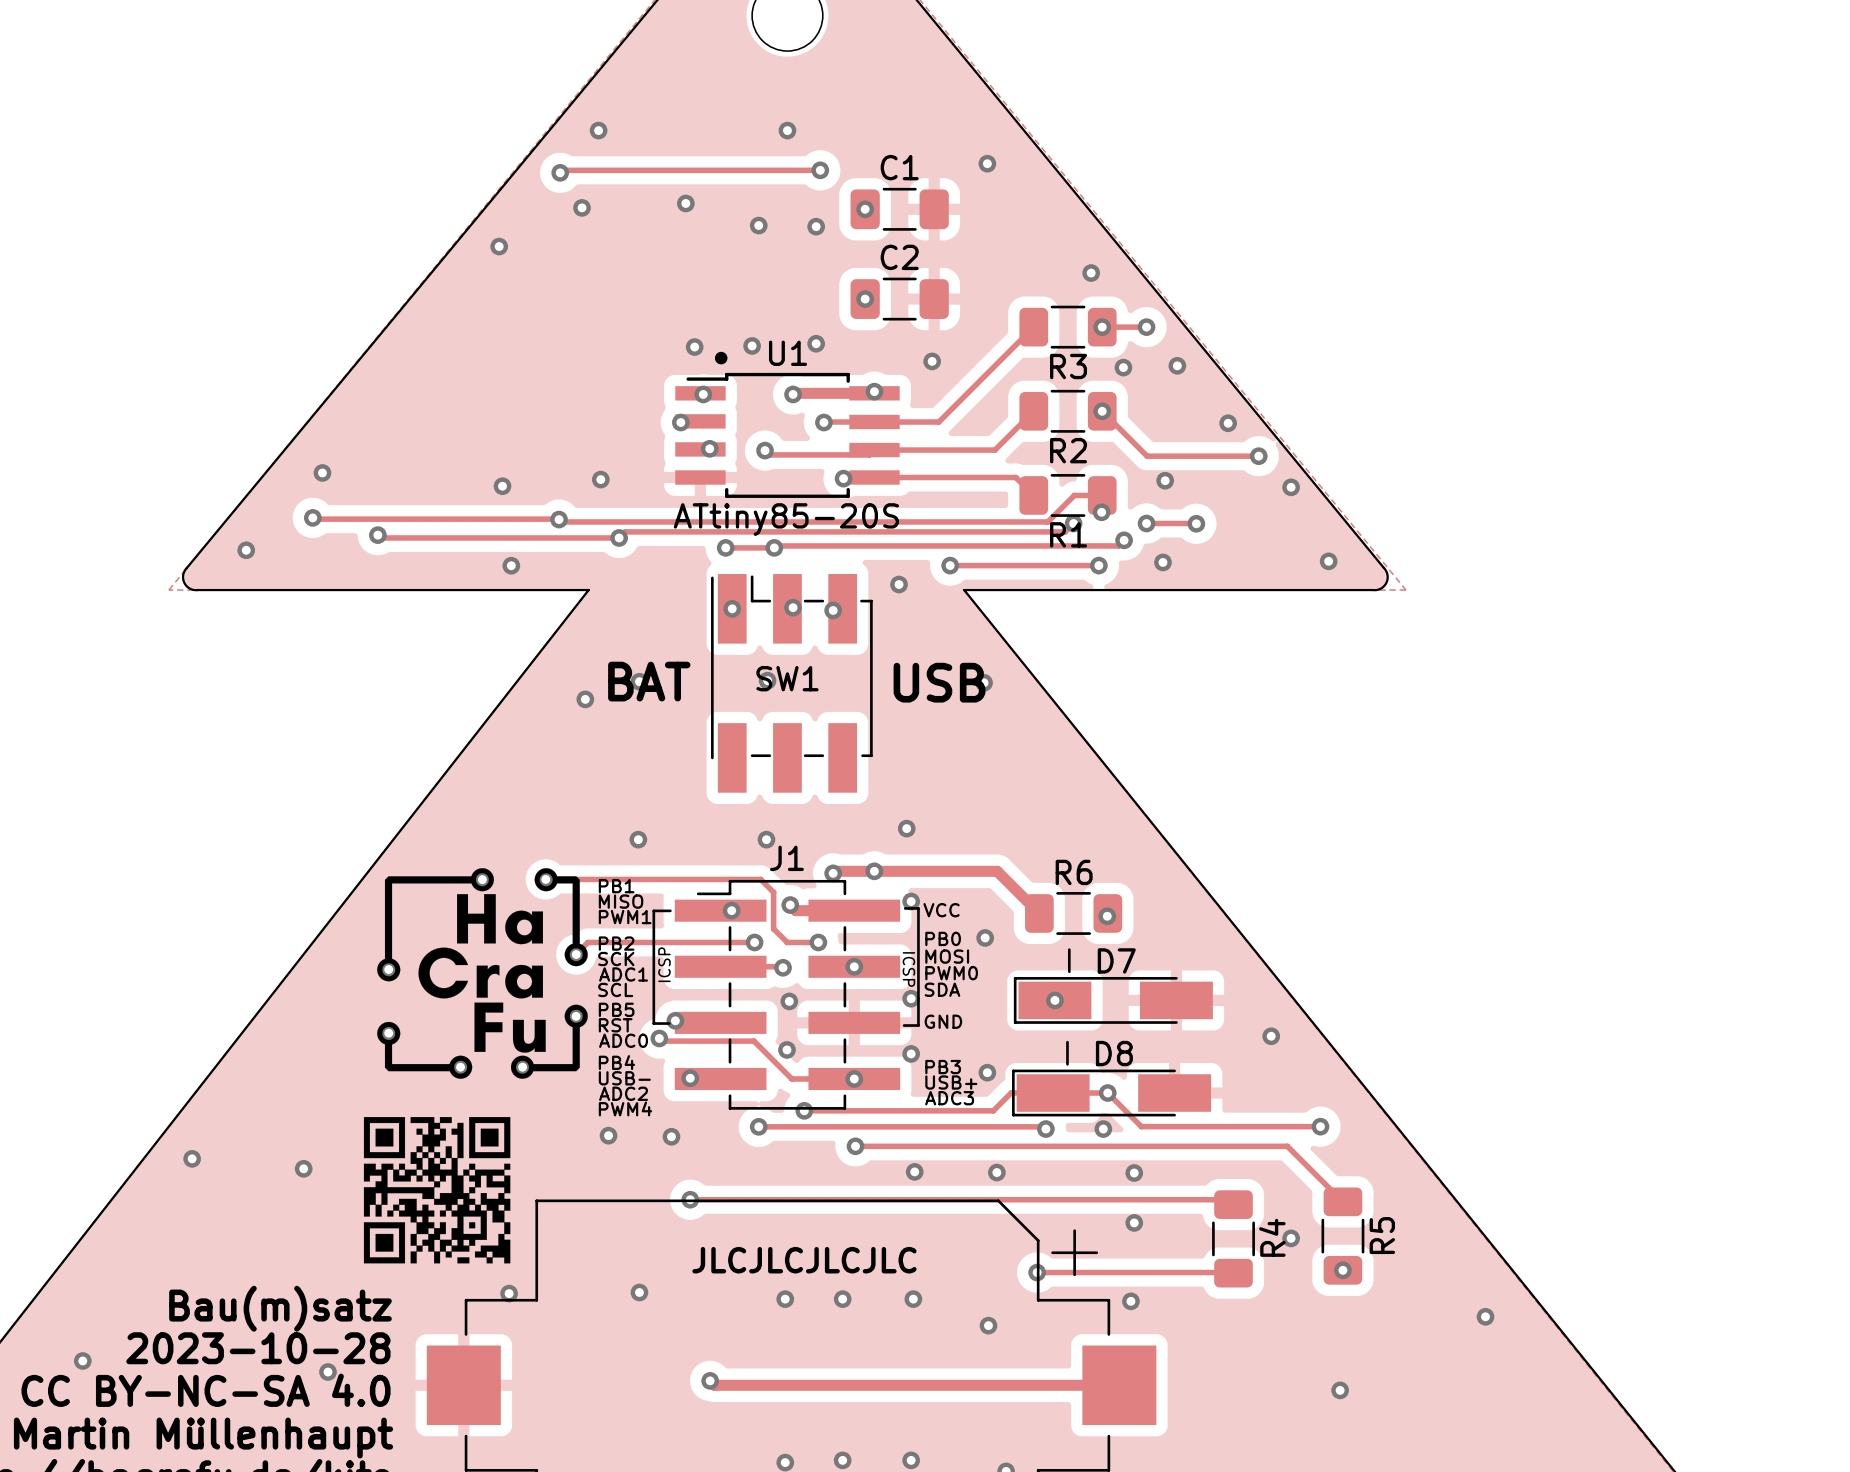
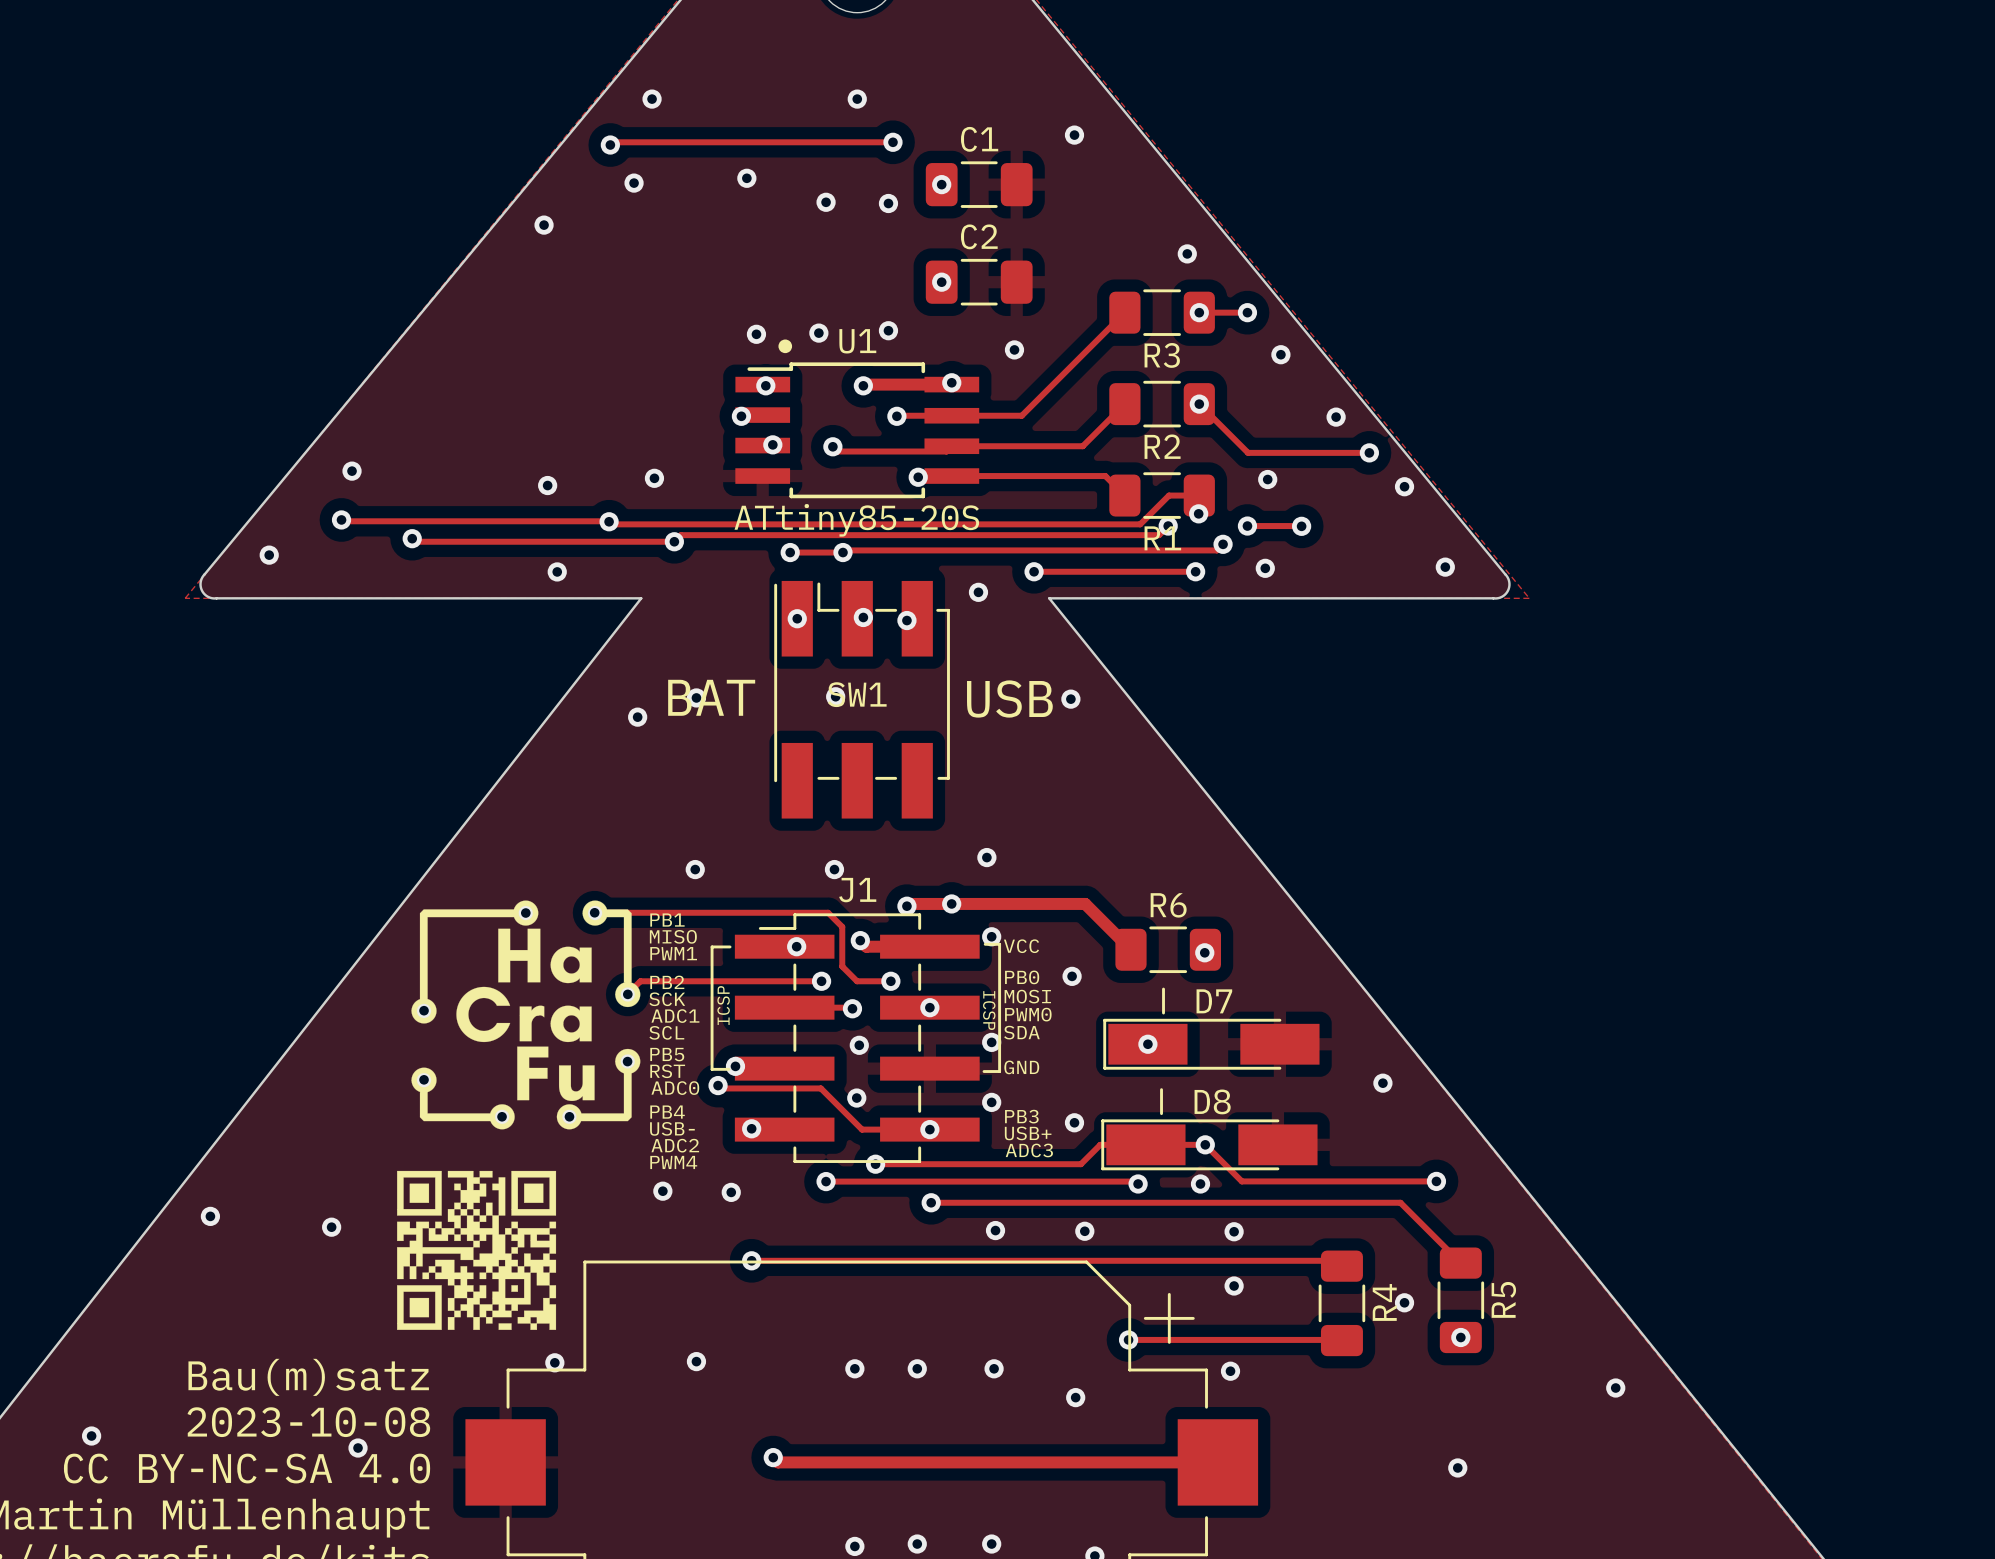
via: (1123, 367) -> none
text: JLCJLCJLCJLC (804, 1260) -> none
text: 2023-10-28 (258, 1348) -> 2023-10-08 (308, 1422)

